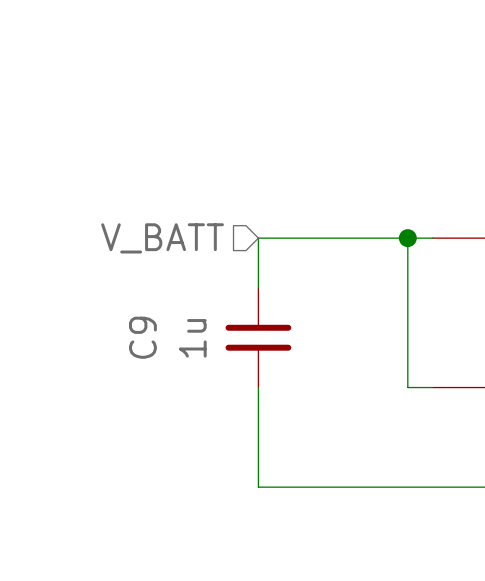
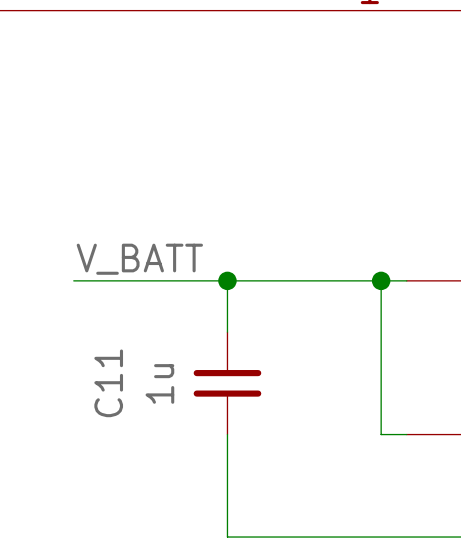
label: none -> V_BATT (139, 259)
wire: none -> (73, 280) (227, 280)
hierarchical label: V_BATT (162, 238) -> none
junction: none -> (227, 280)
C9 name: C9 (142, 337) -> C11 (108, 383)

